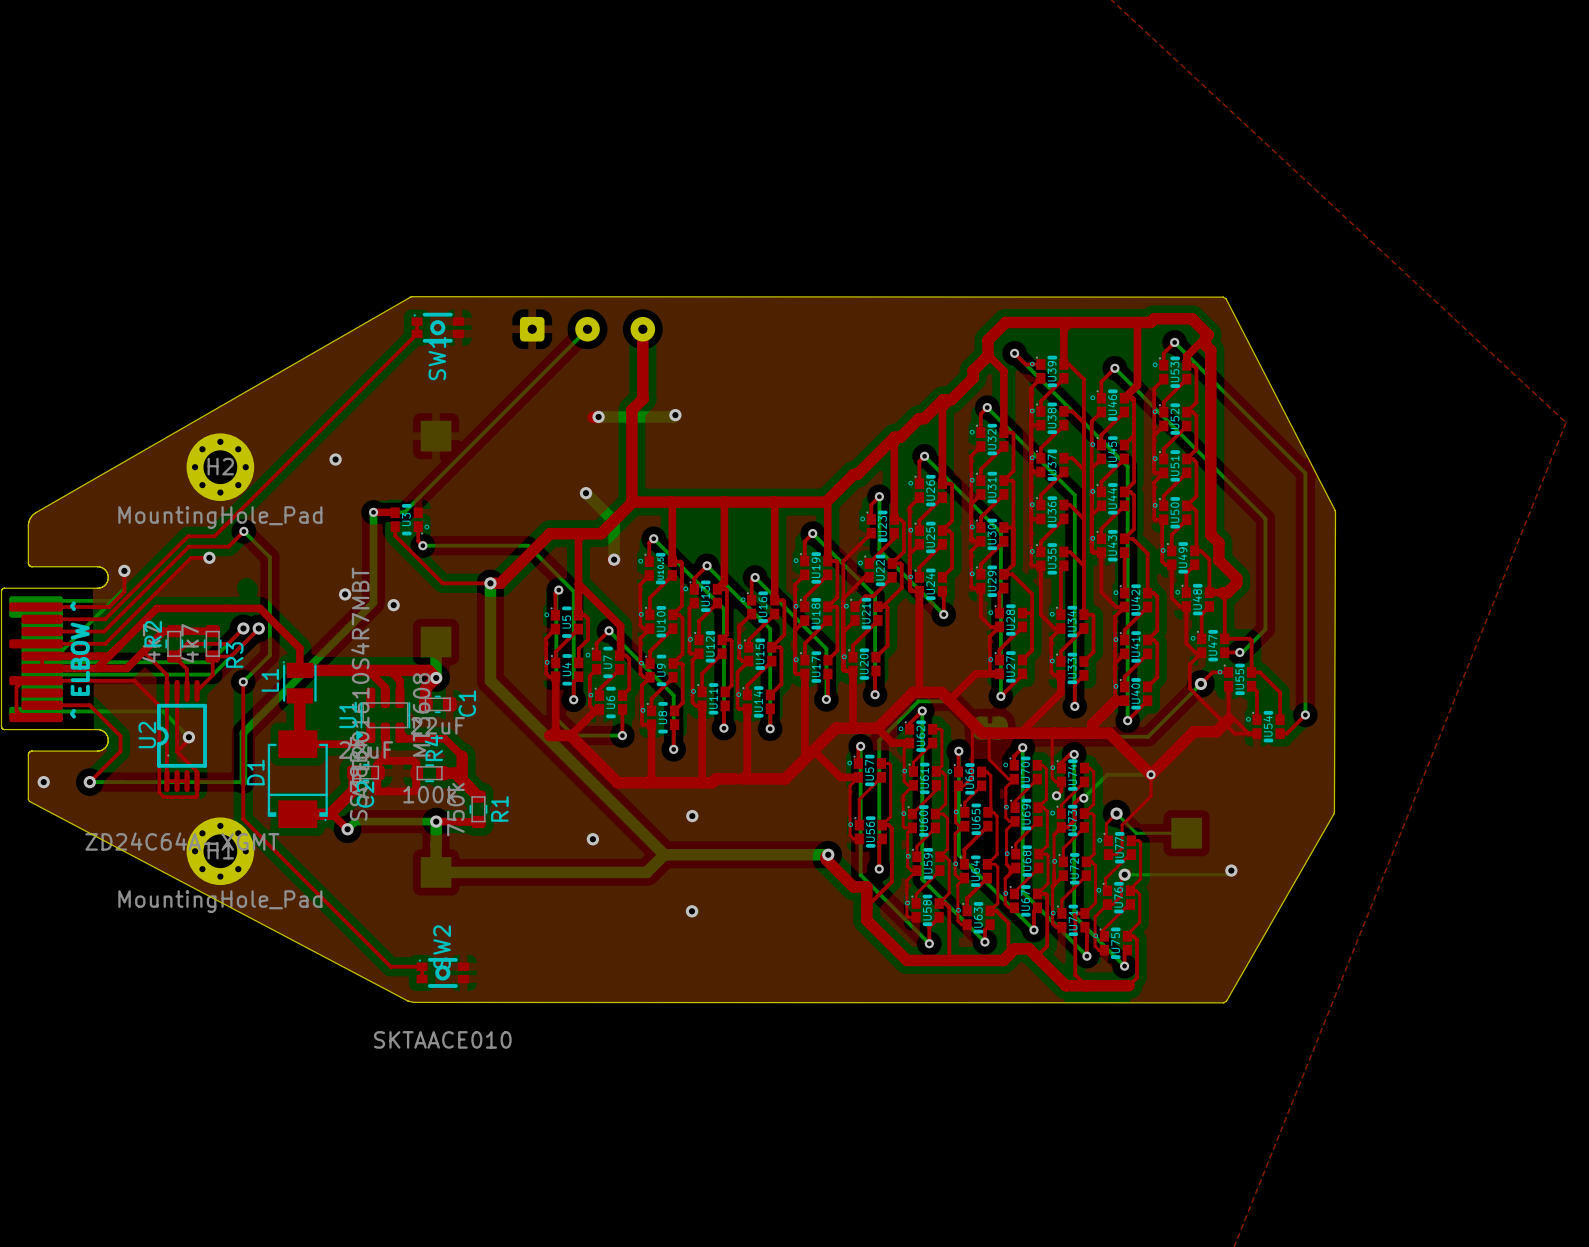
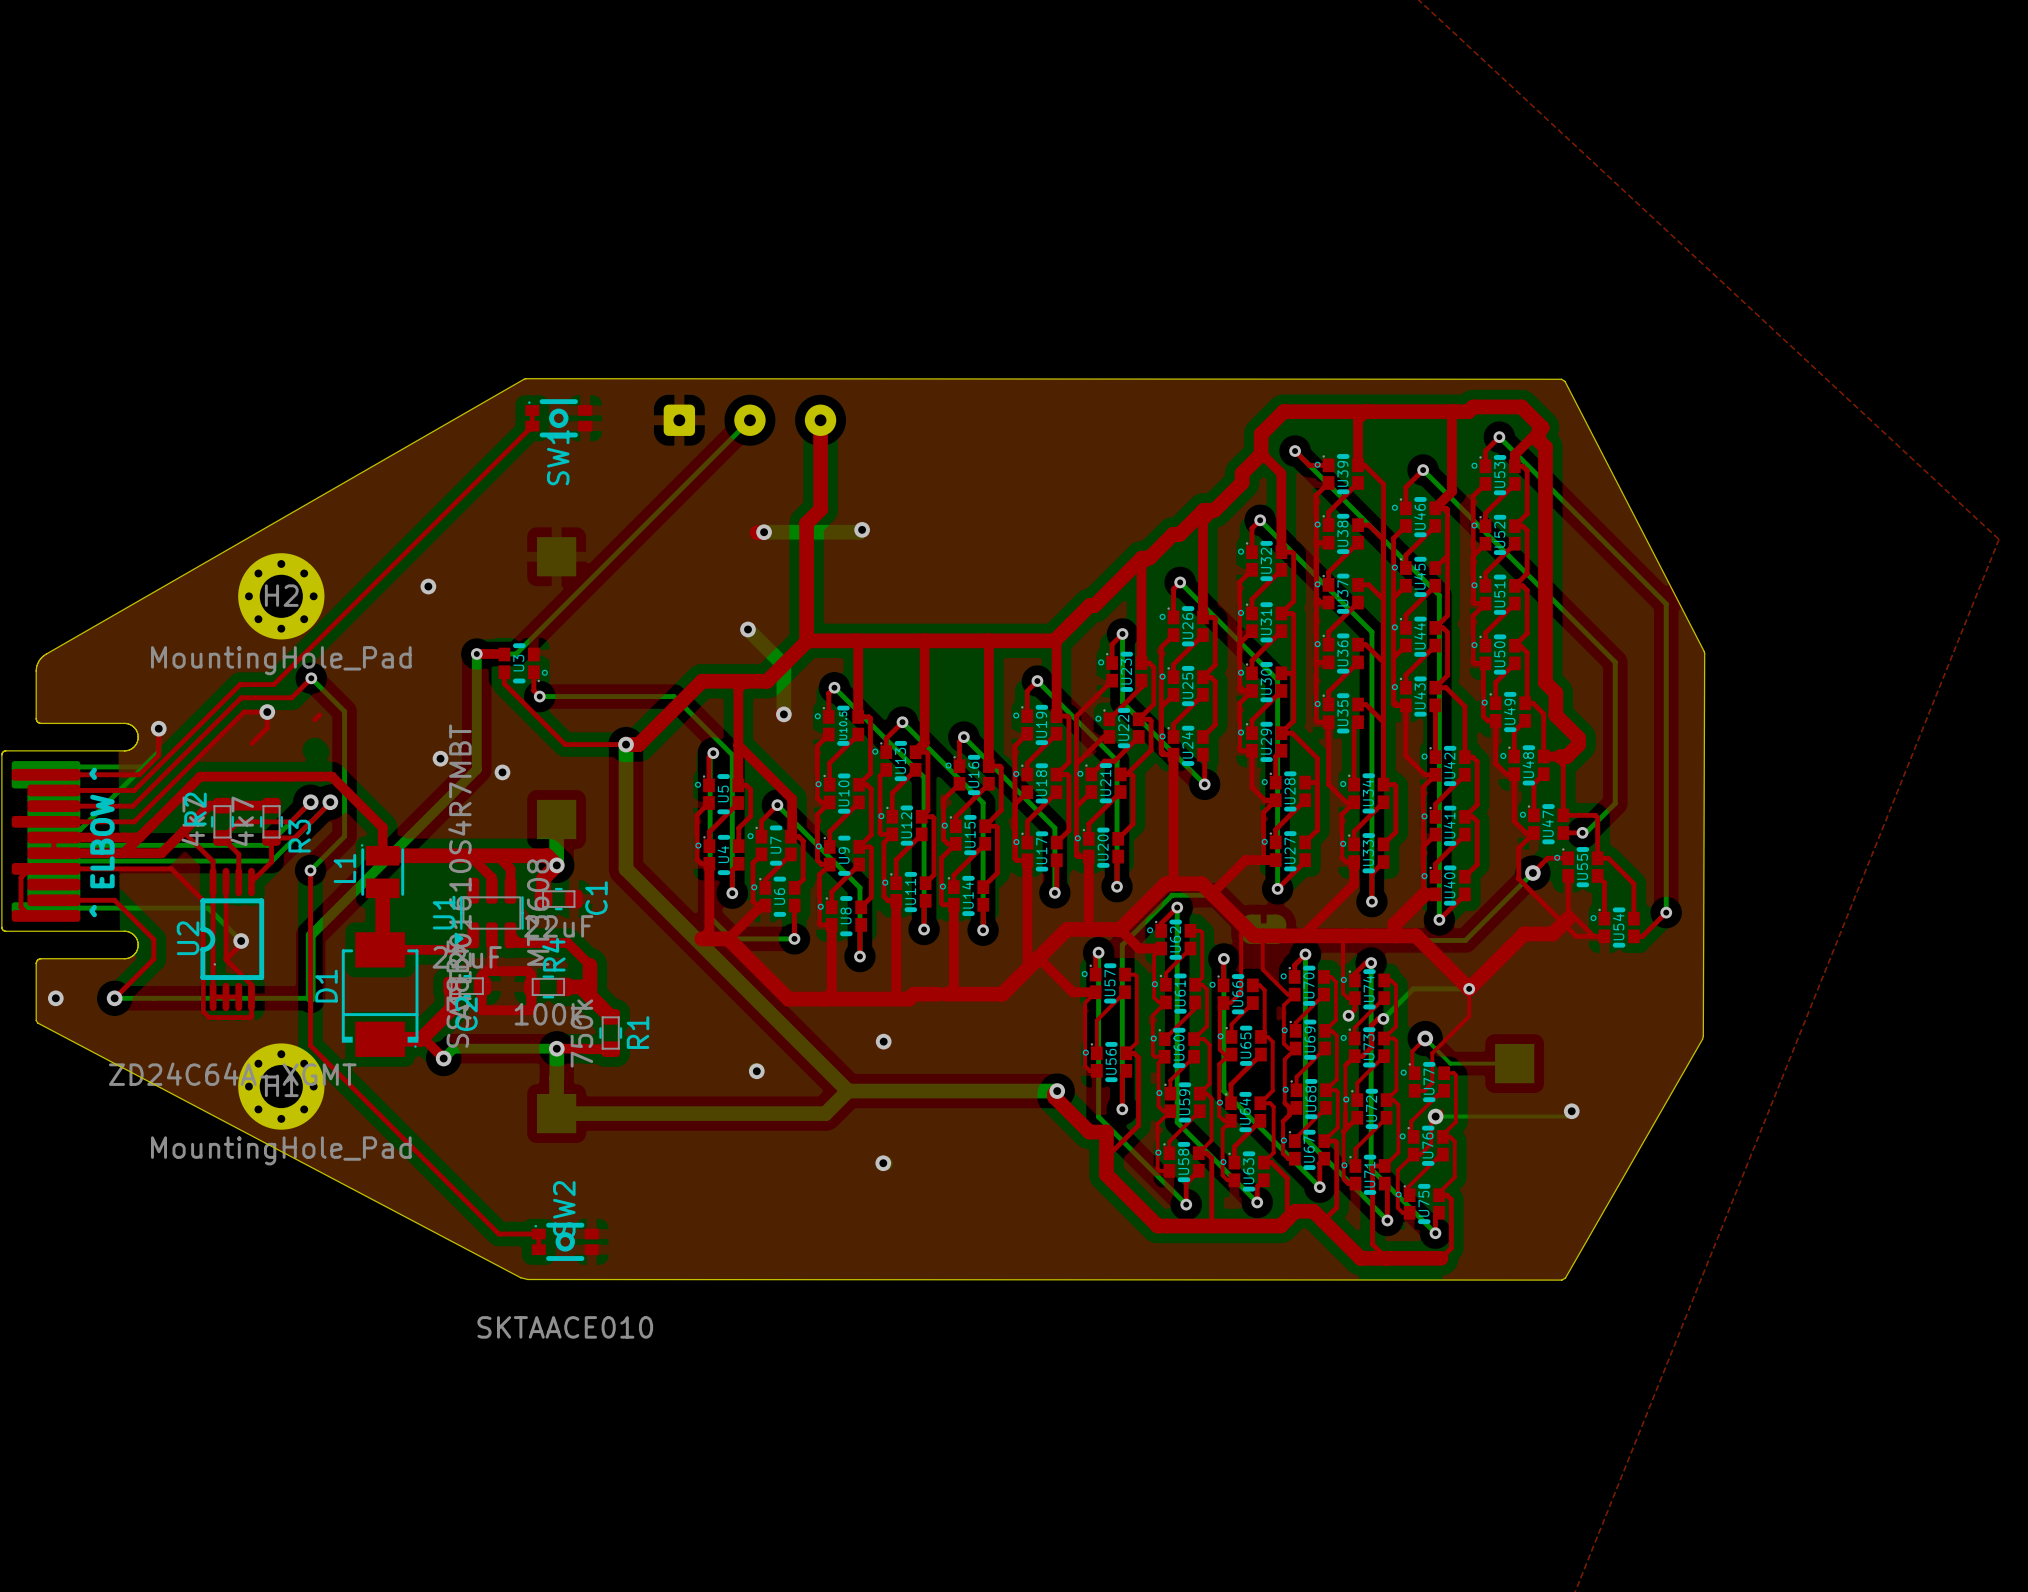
top track: none -> (267, 712) (267, 728) (251, 743)
top track: none -> (319, 714) (314, 719)

